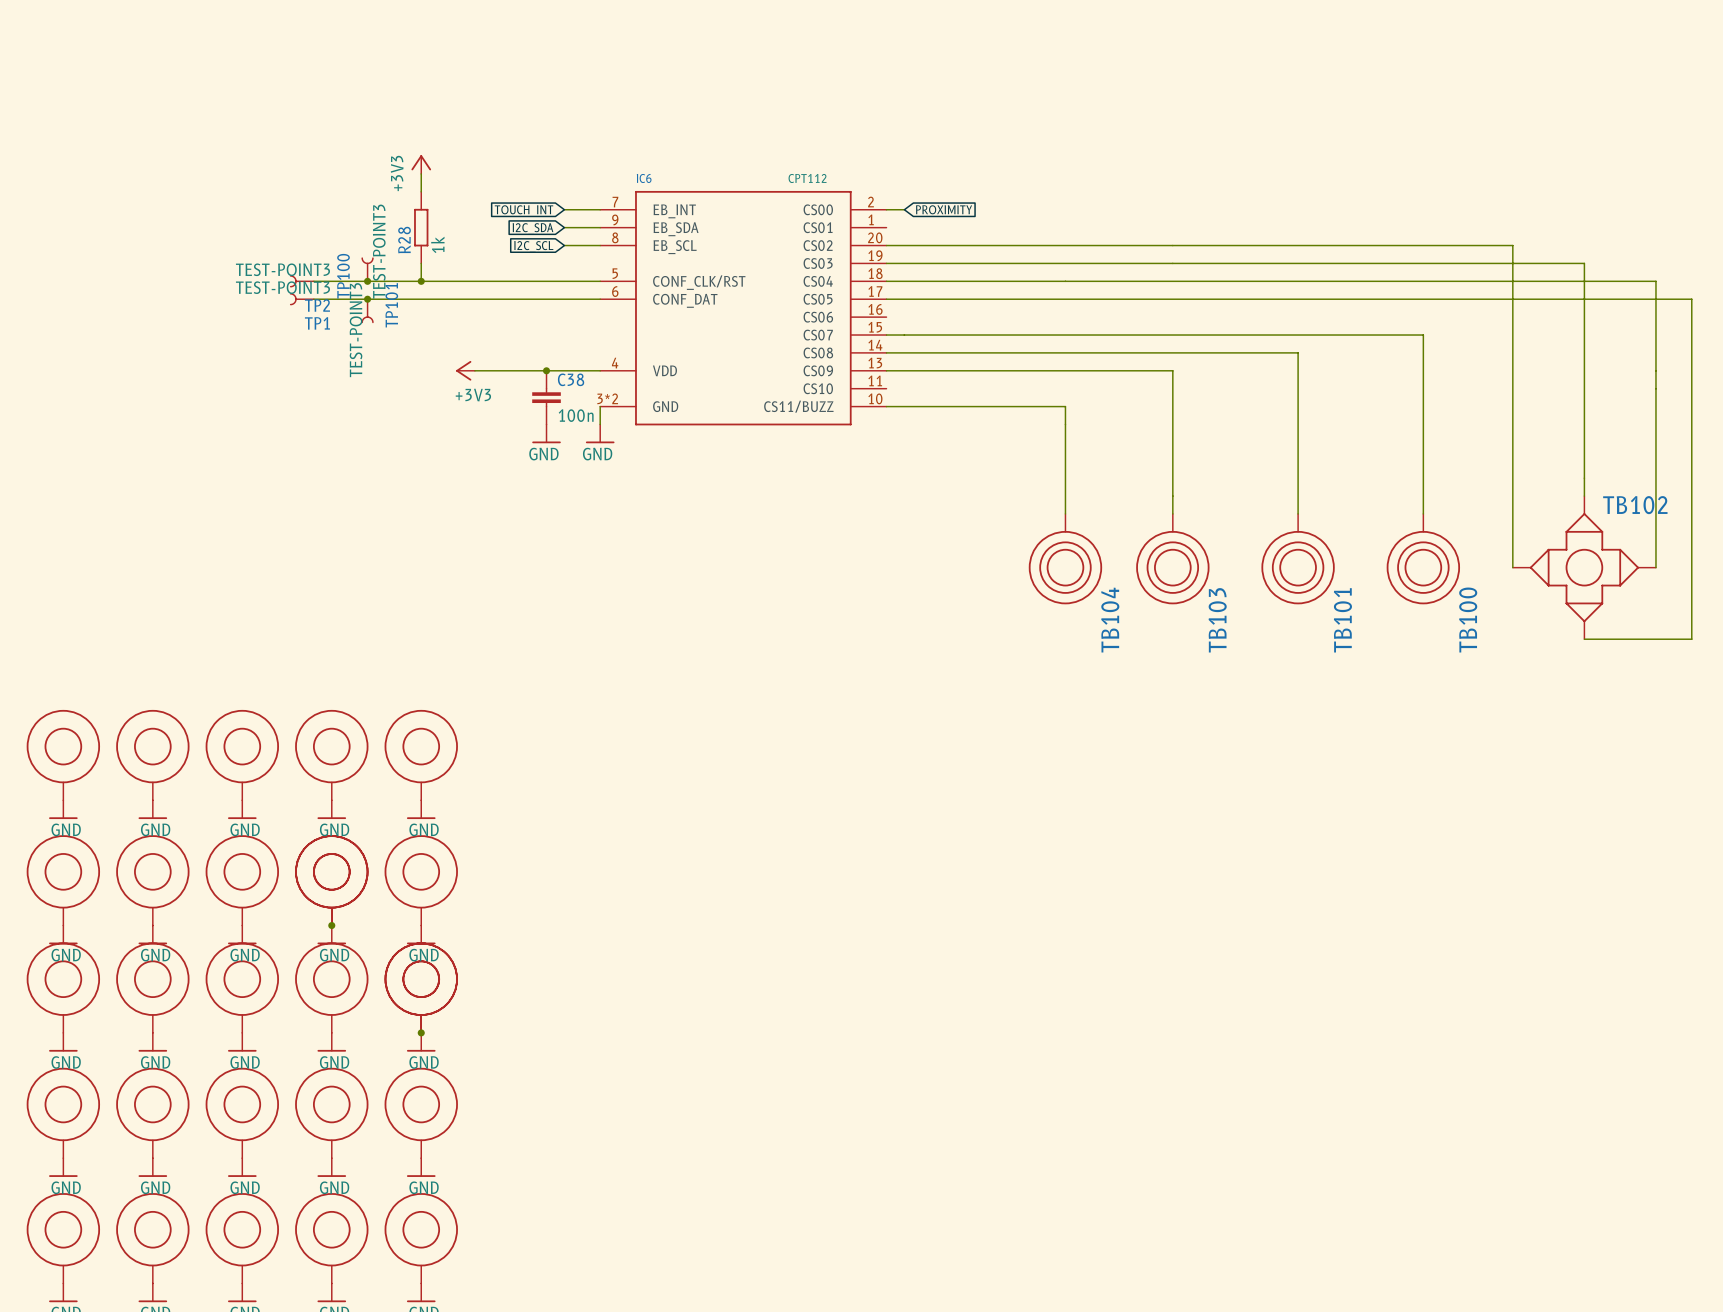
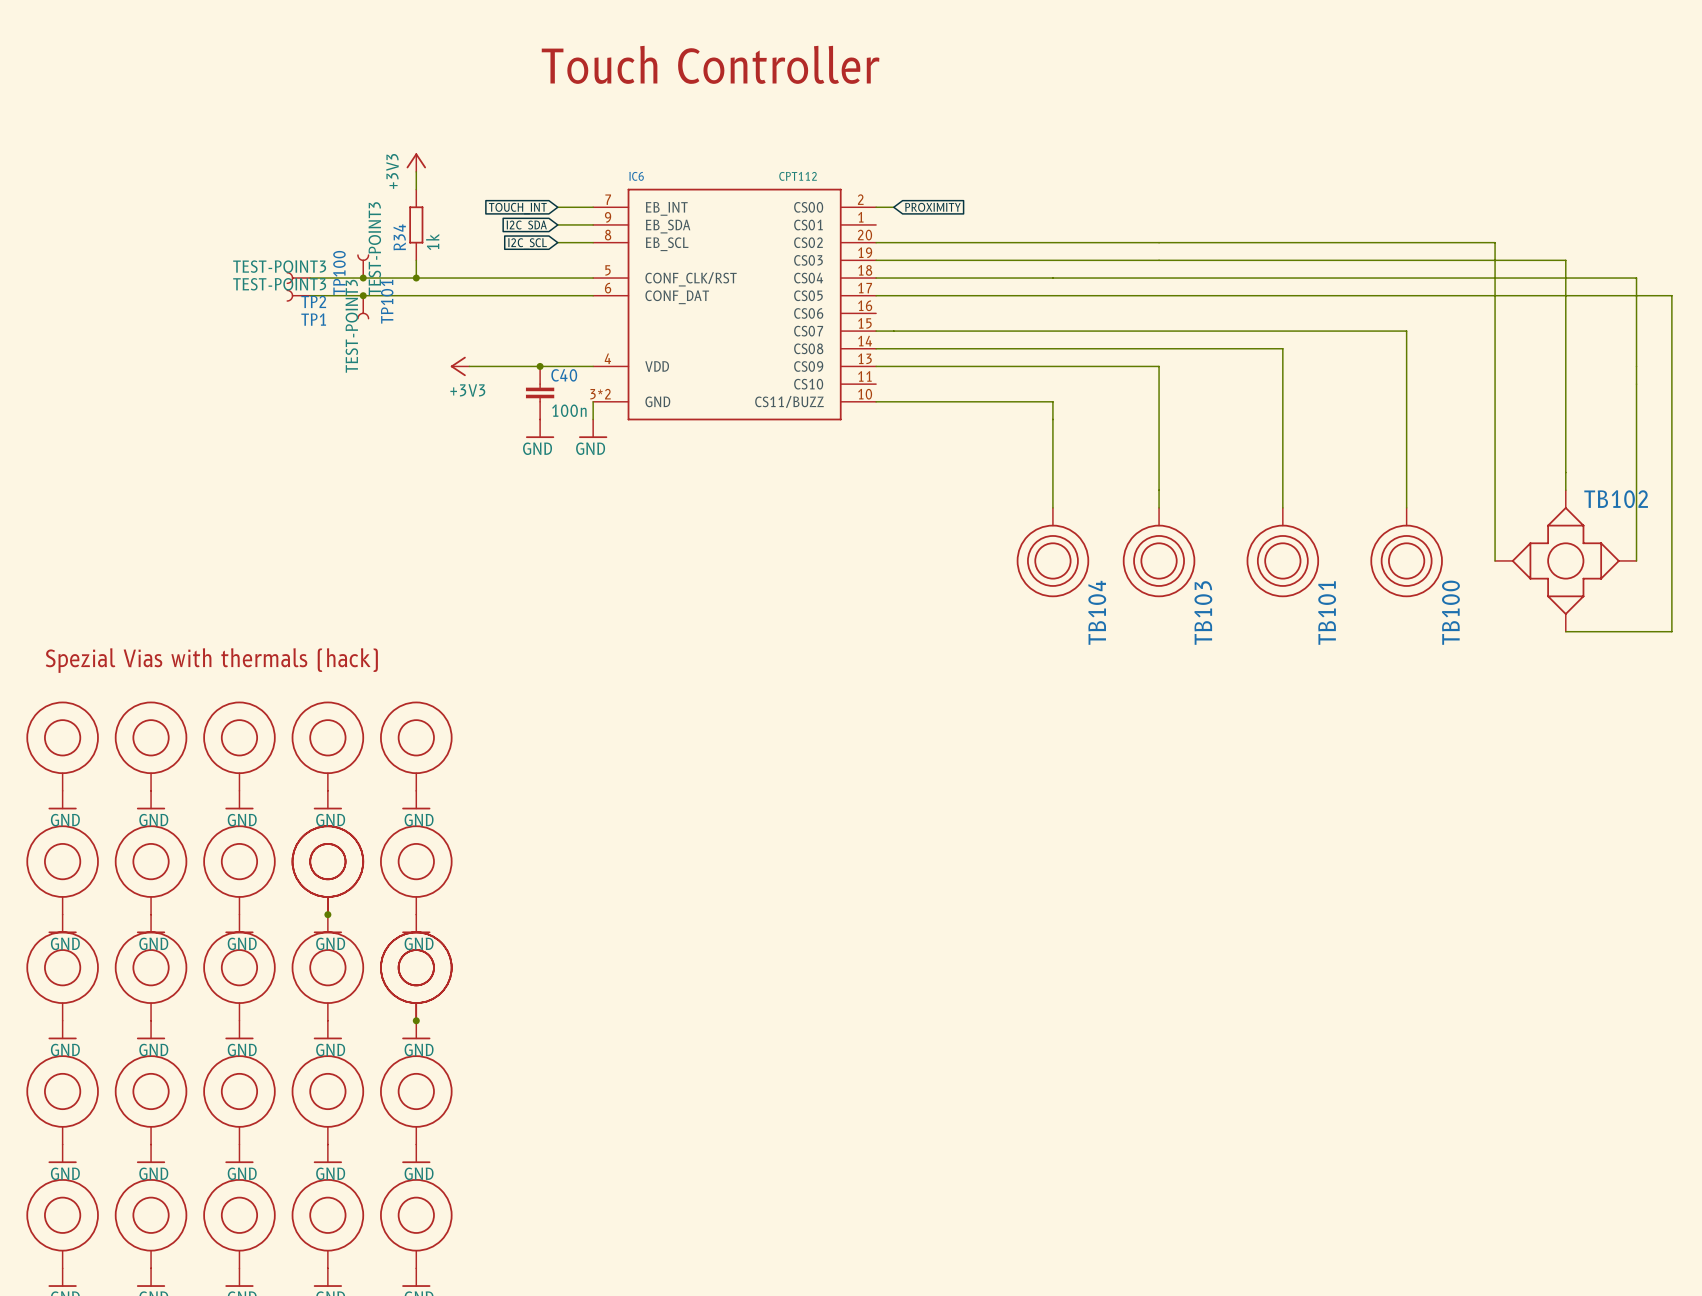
text: none -> Touch Controller (710, 64)
R28 name: R28 (404, 240) -> R34 (399, 237)
C38 name: C38 (571, 379) -> C40 (564, 375)
text: none -> Spezial Vias with thermals (hack) (211, 660)

